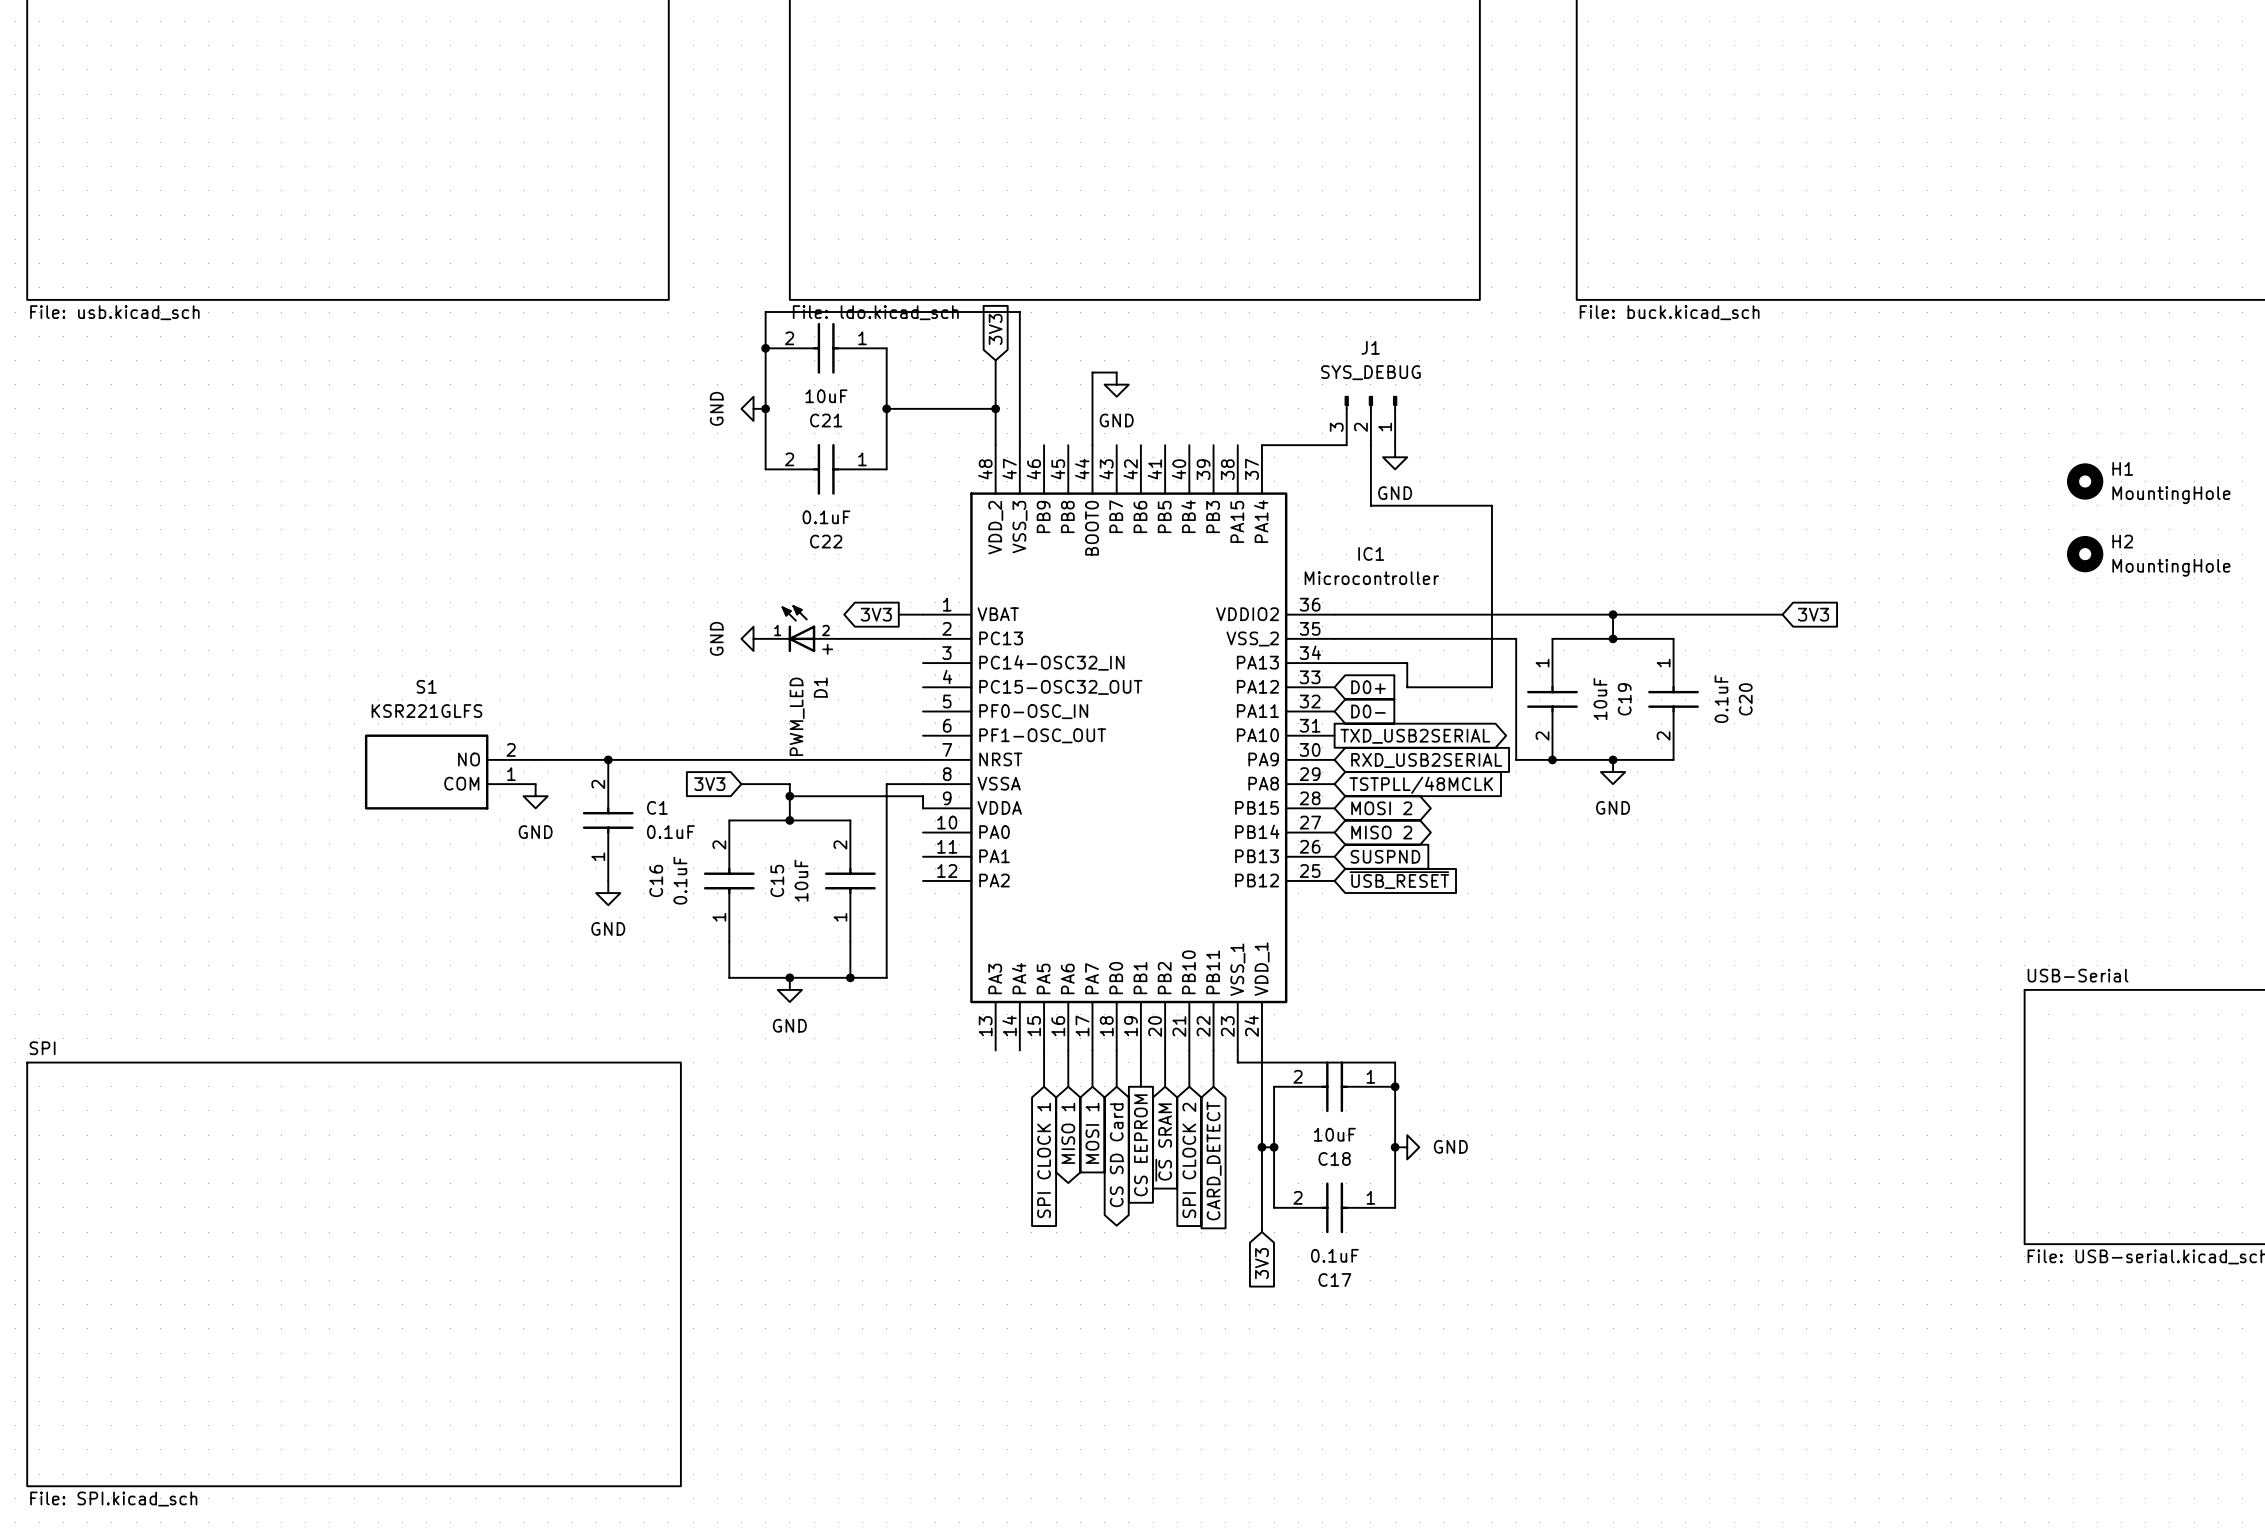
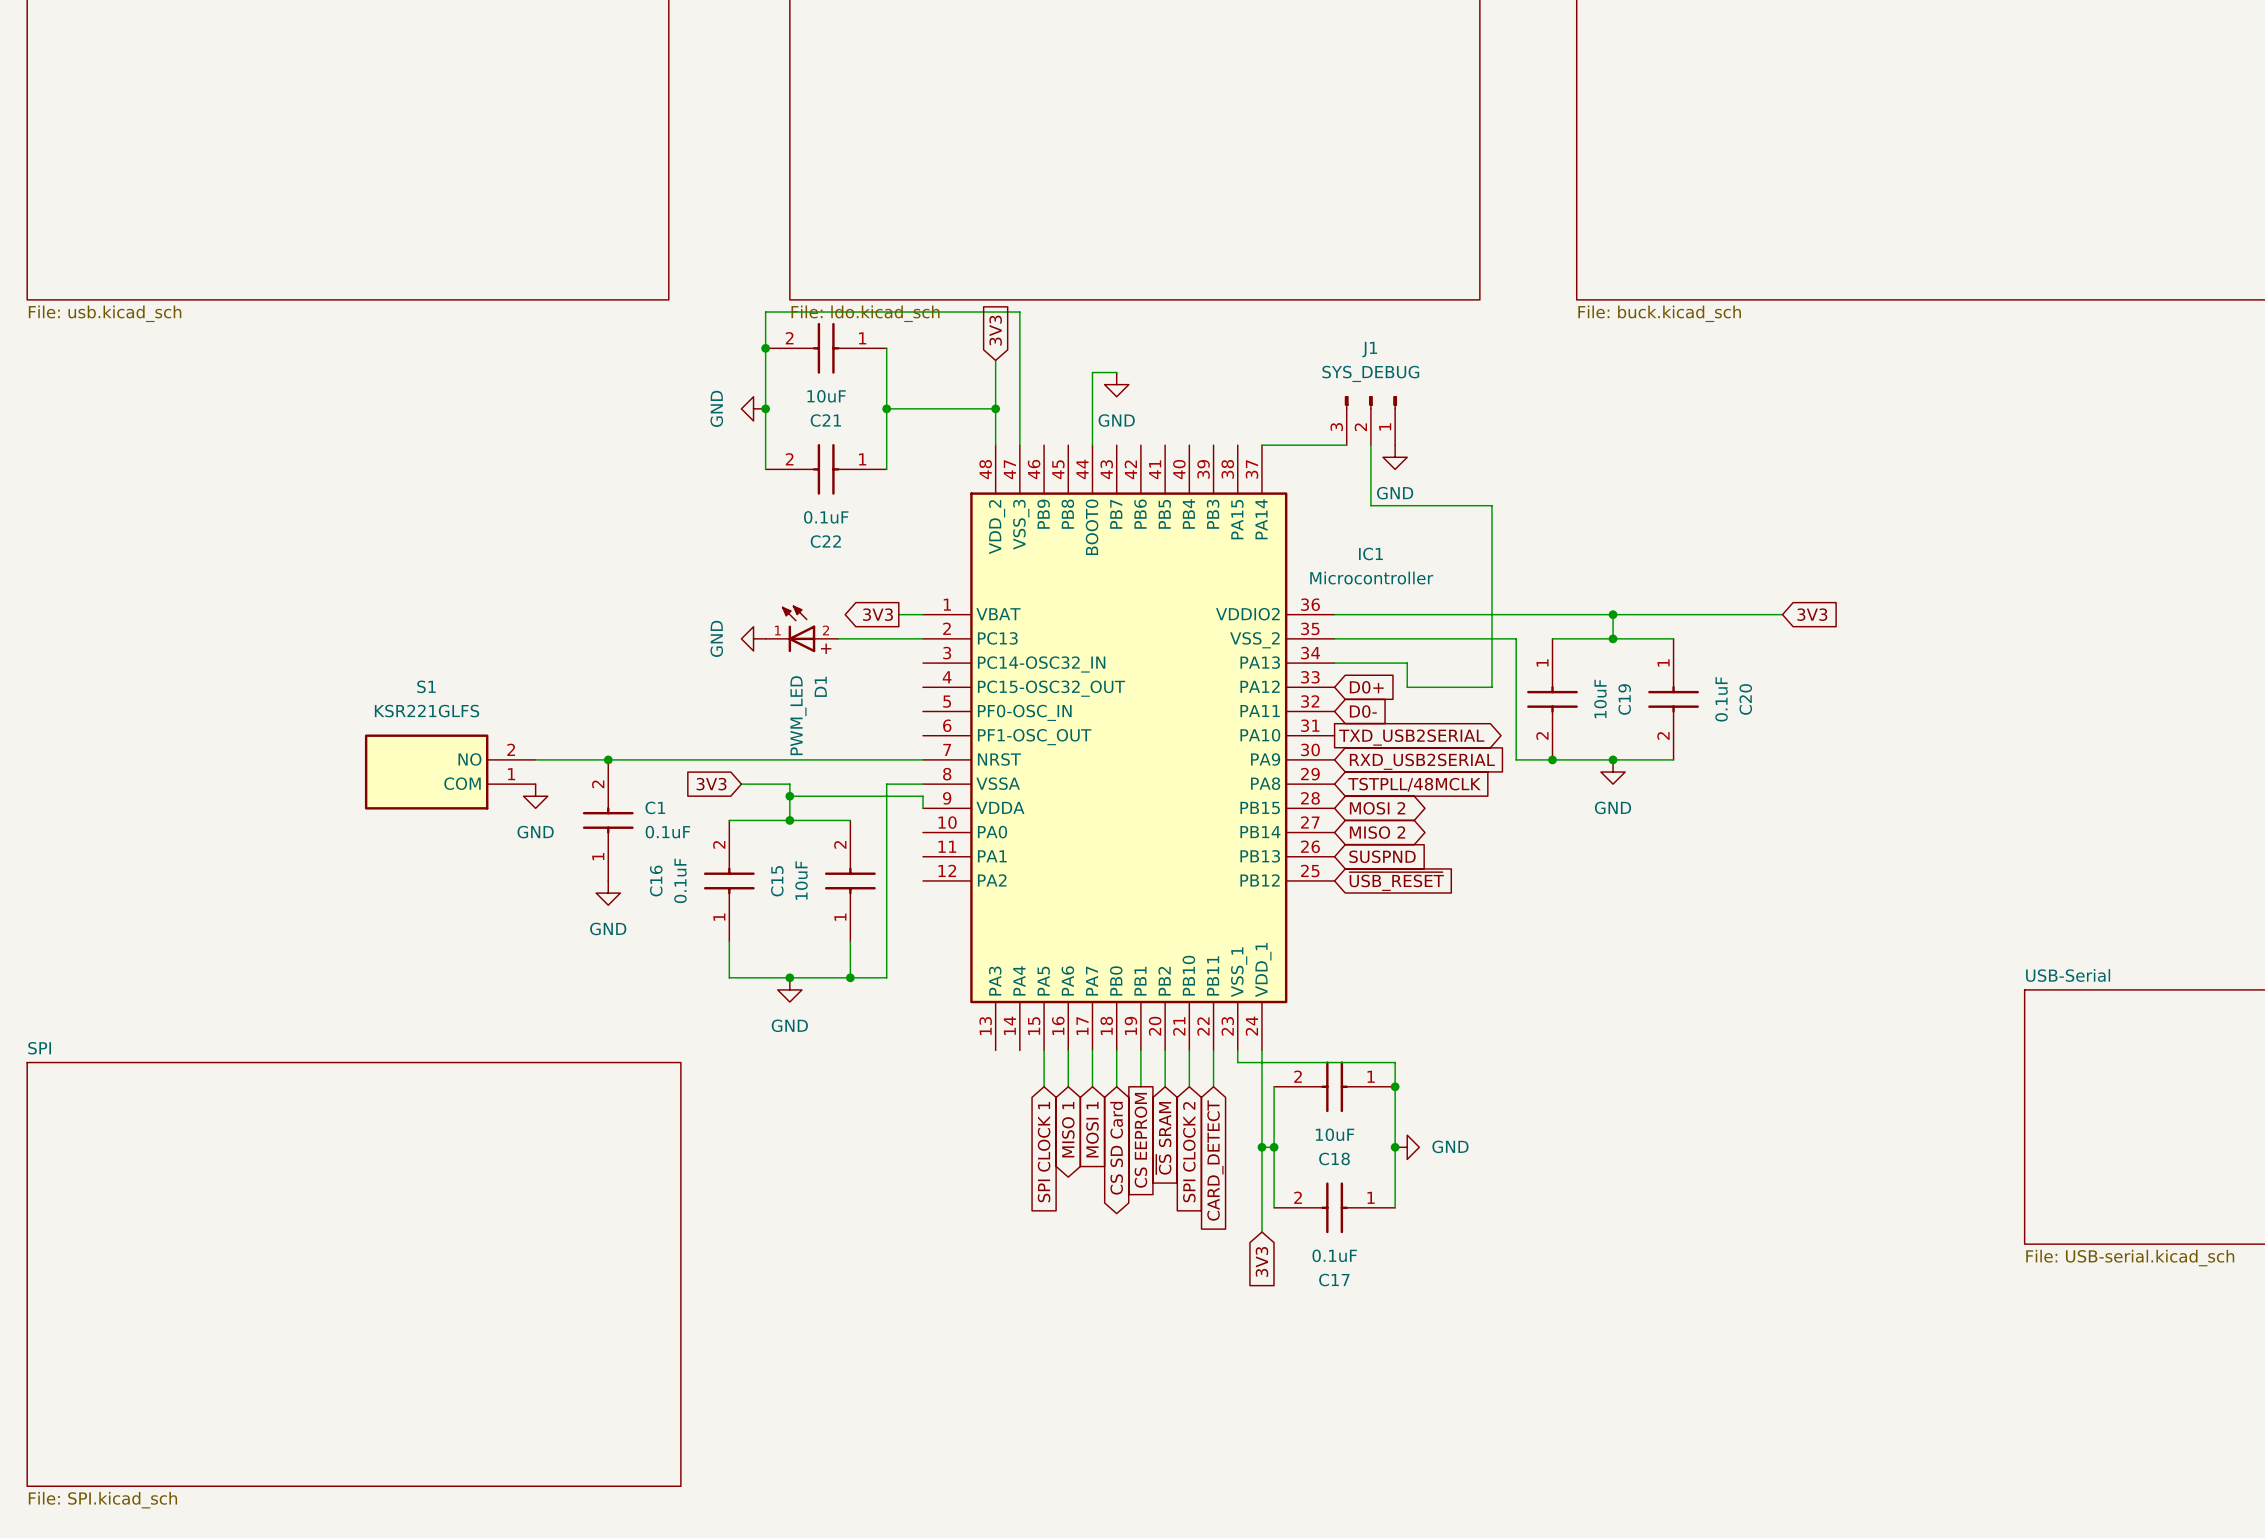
H1: MountingHole (2085, 481) -> none
H2: MountingHole (2085, 554) -> none

